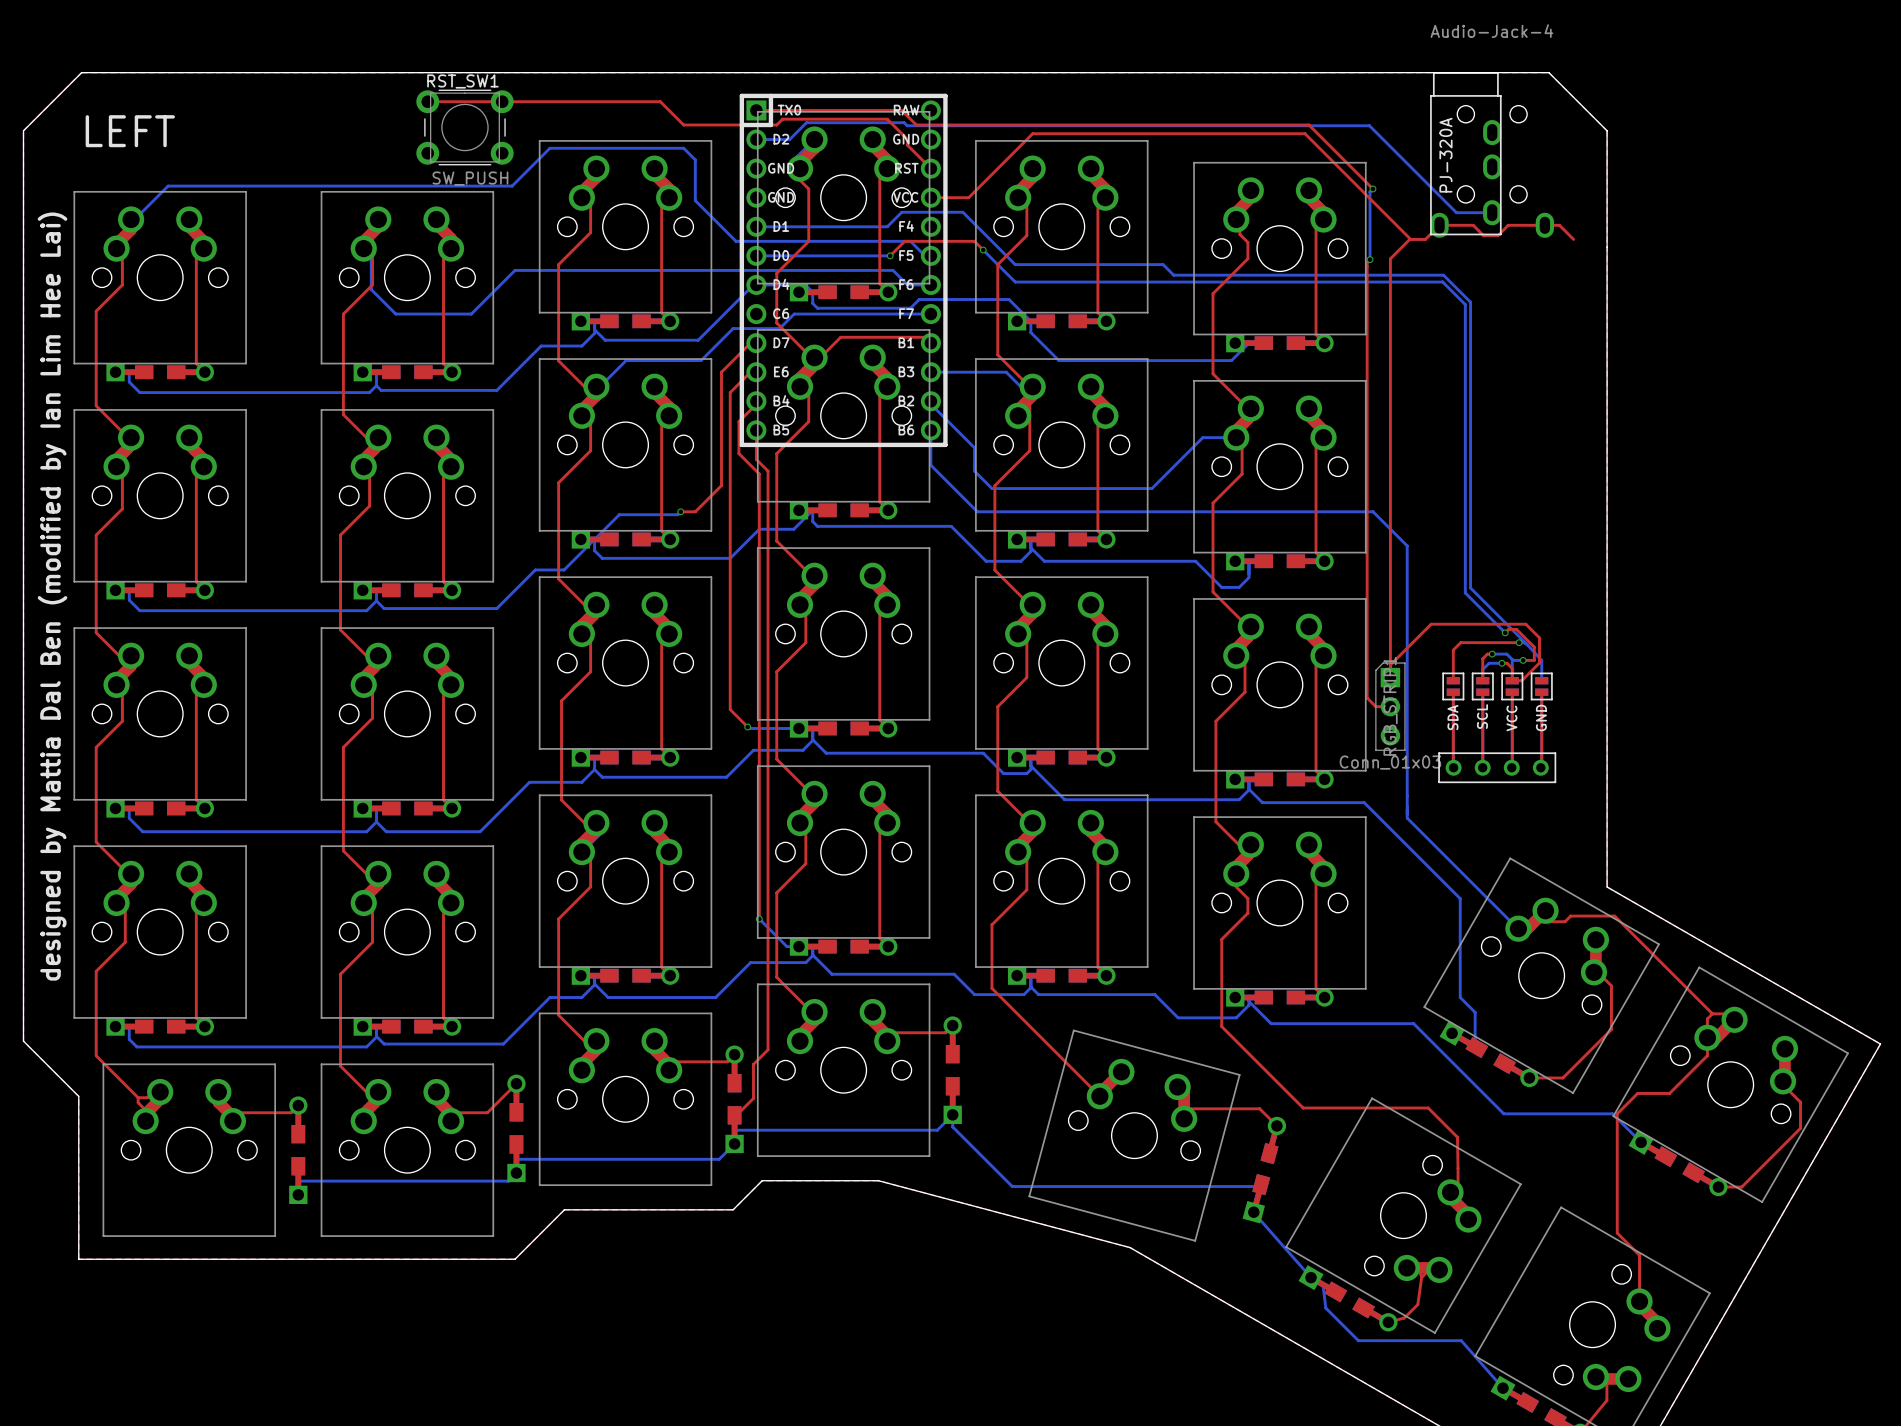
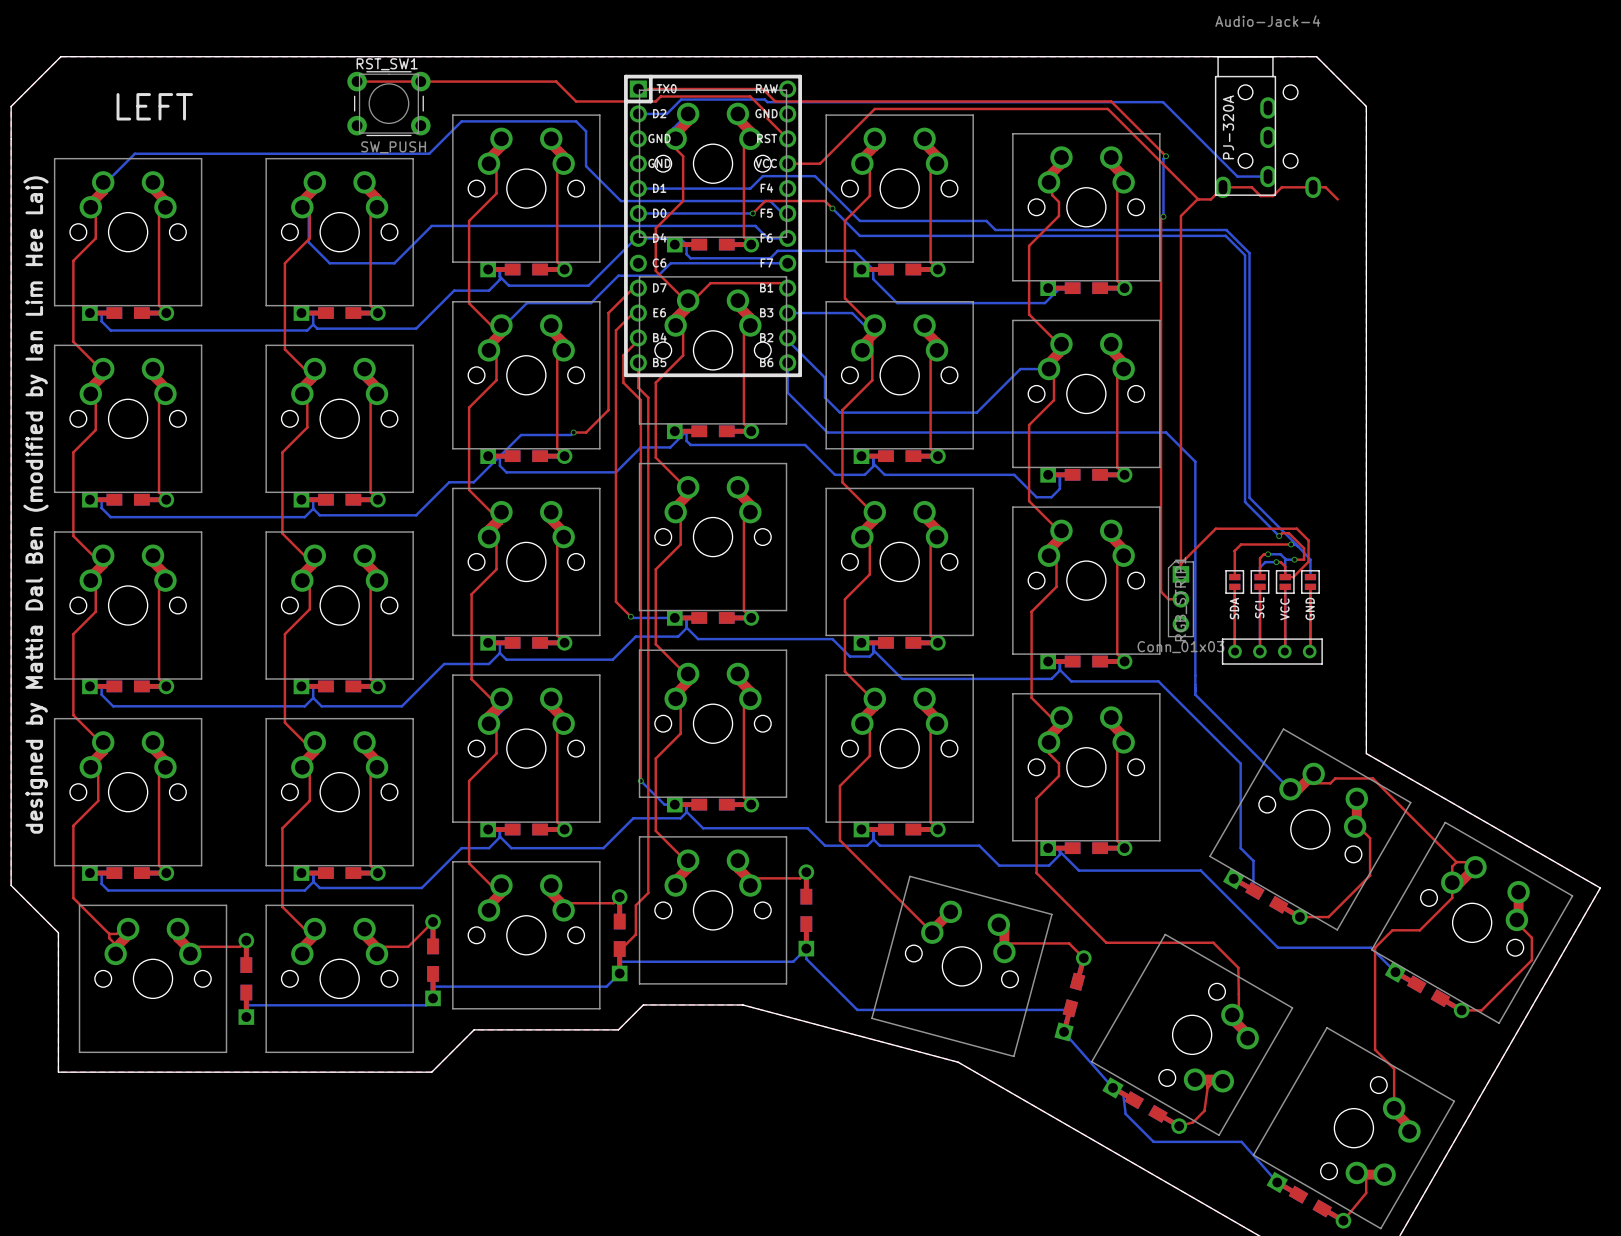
text position: LEFT (130, 131) -> LEFT (154, 106)

